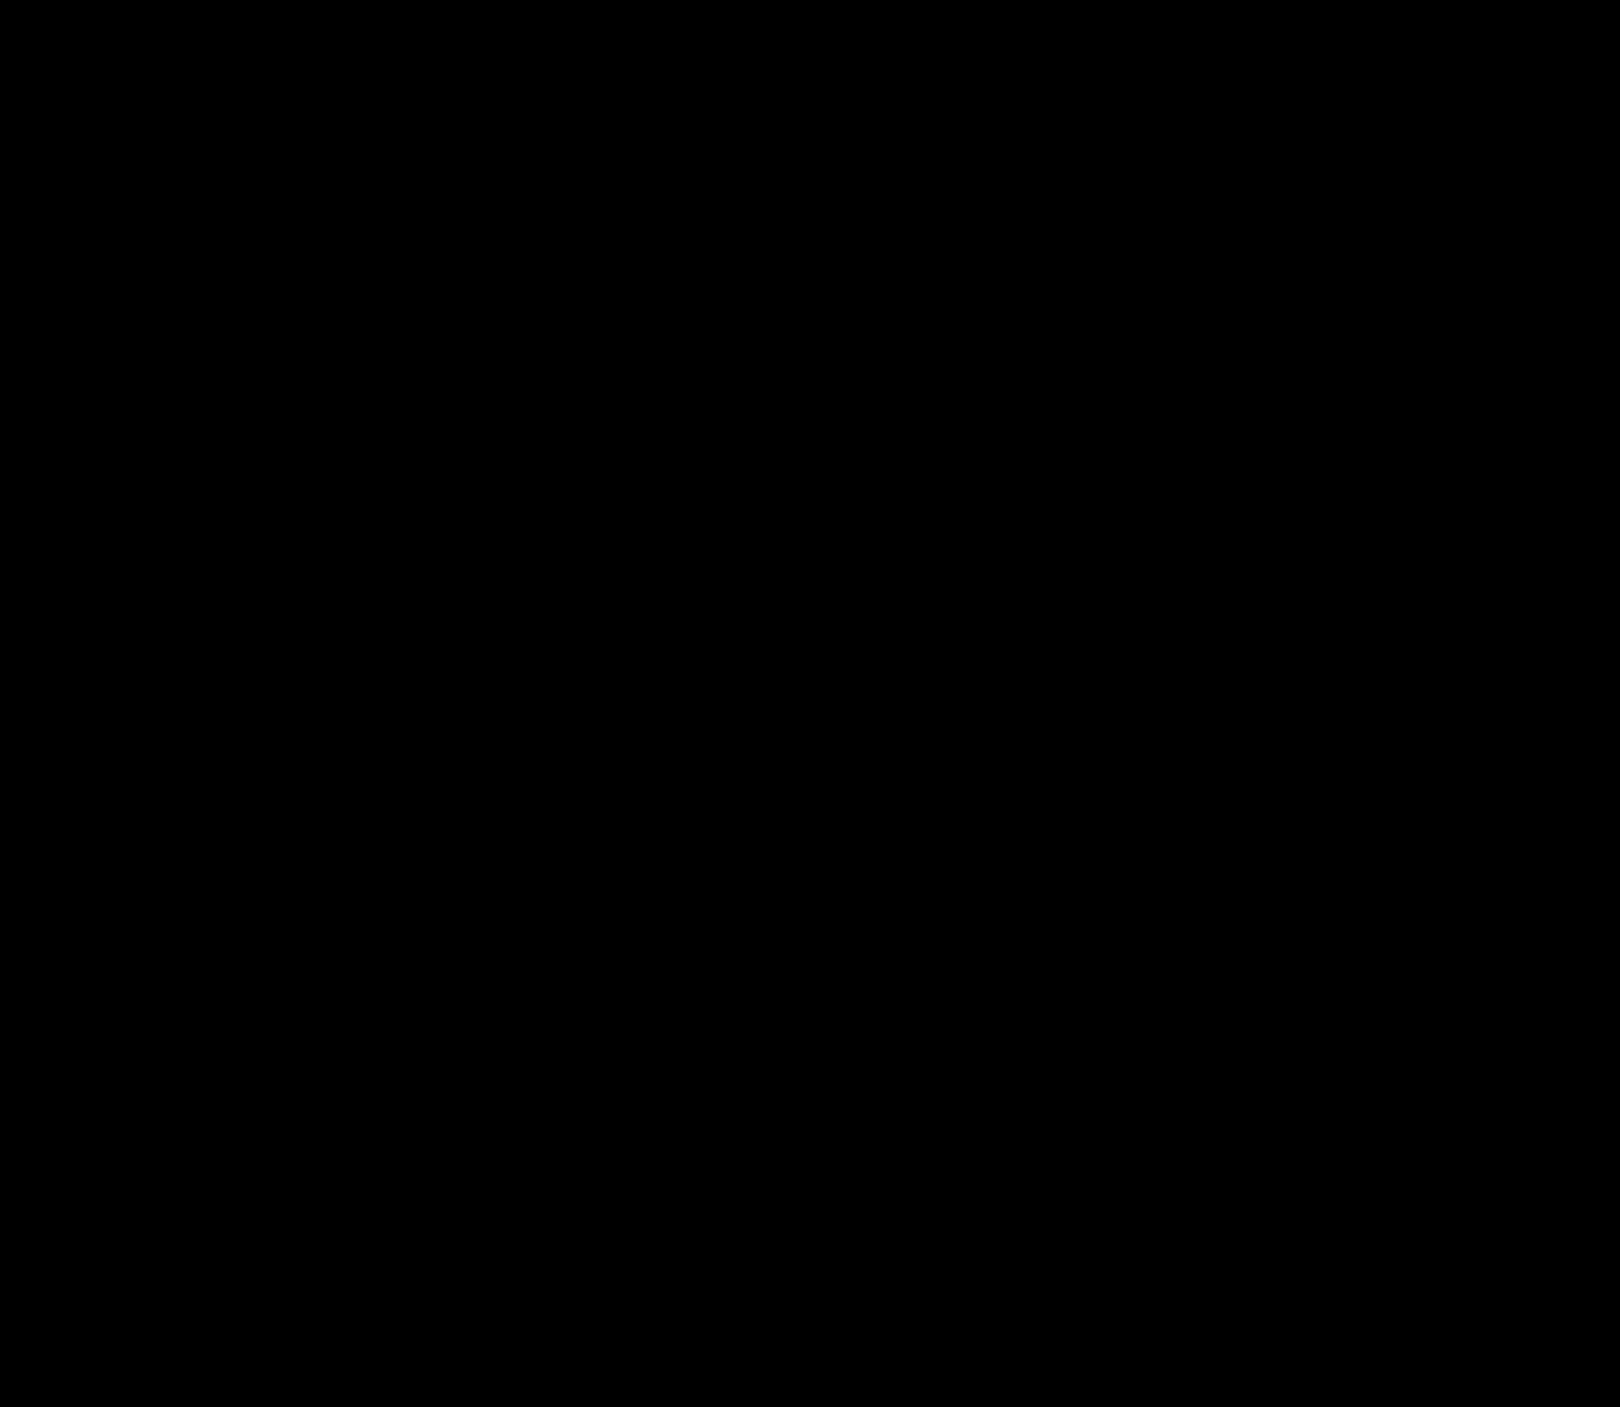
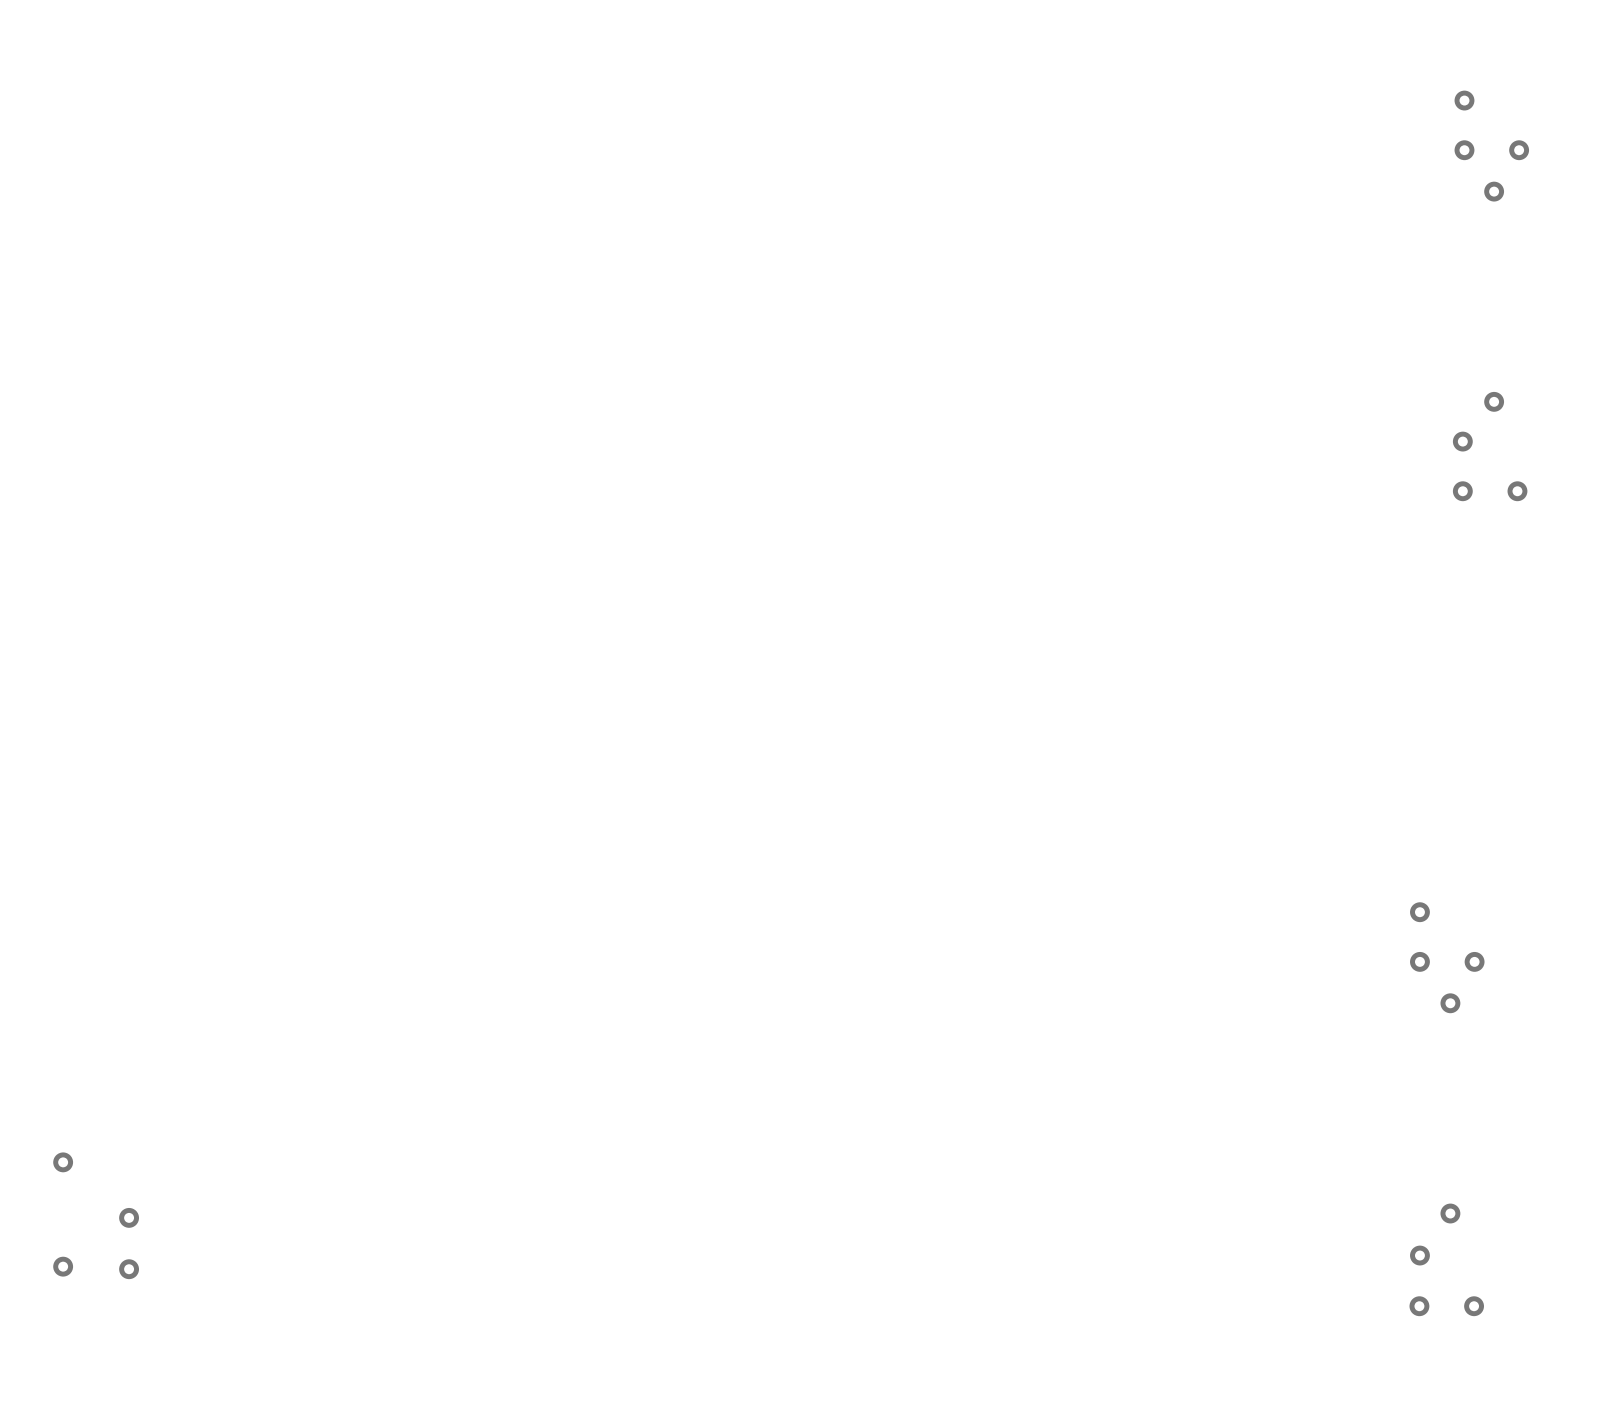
via: none -> (1464, 100)
via: none -> (1464, 150)
via: none -> (1519, 150)
via: none -> (1494, 191)
via: none -> (1494, 401)
via: none -> (1462, 441)
via: none -> (1462, 491)
via: none -> (1517, 491)
via: none -> (1419, 912)
via: none -> (1419, 961)
via: none -> (1474, 961)
via: none -> (1450, 1003)
via: none -> (63, 1162)
via: none -> (1450, 1213)
via: none -> (129, 1217)
via: none -> (1419, 1255)
via: none -> (63, 1266)
via: none -> (129, 1269)
via: none -> (1419, 1306)
via: none -> (1474, 1306)

